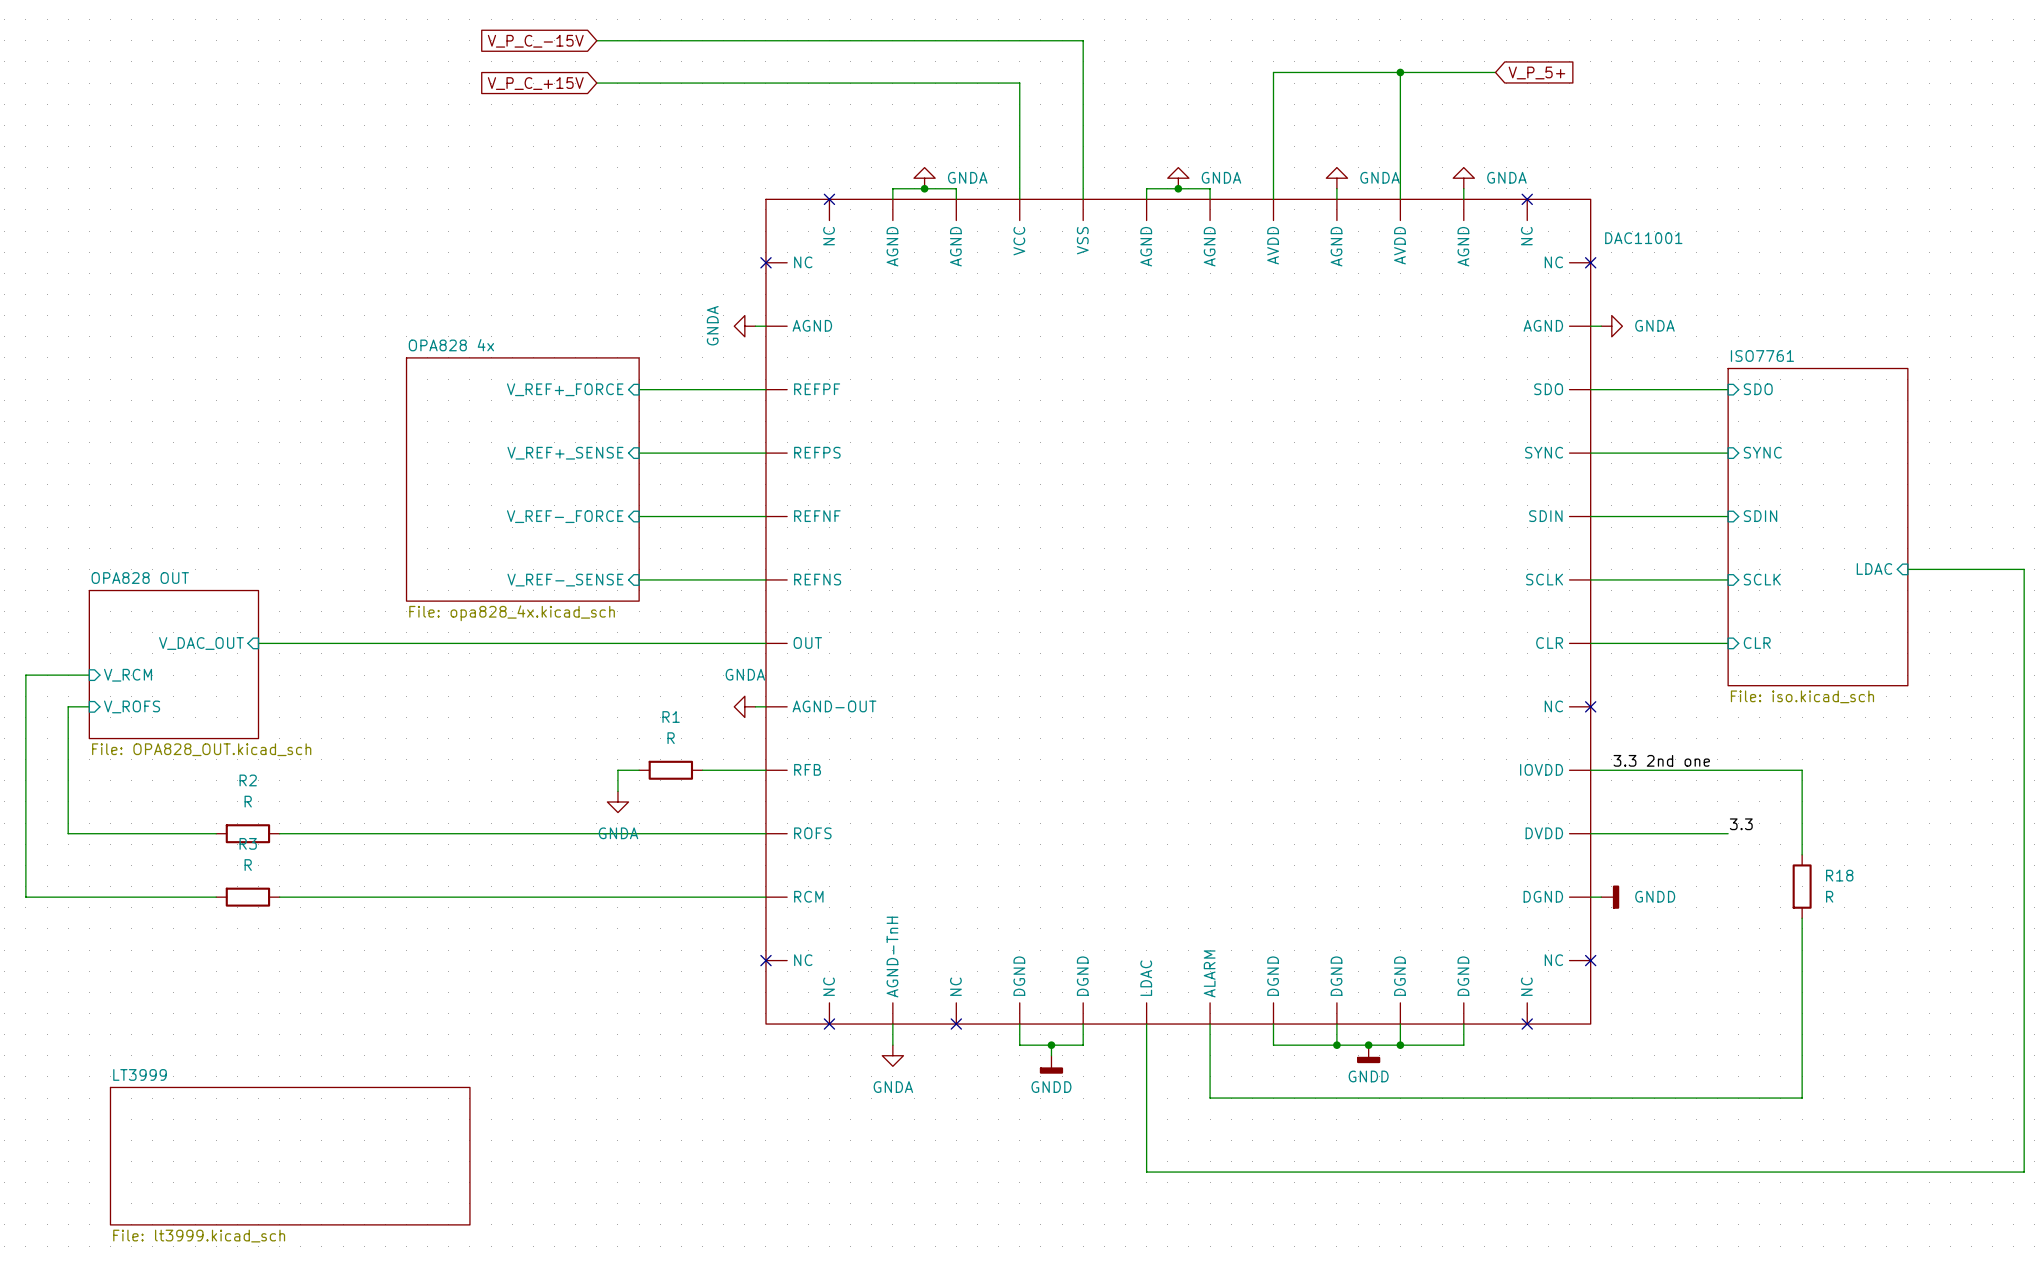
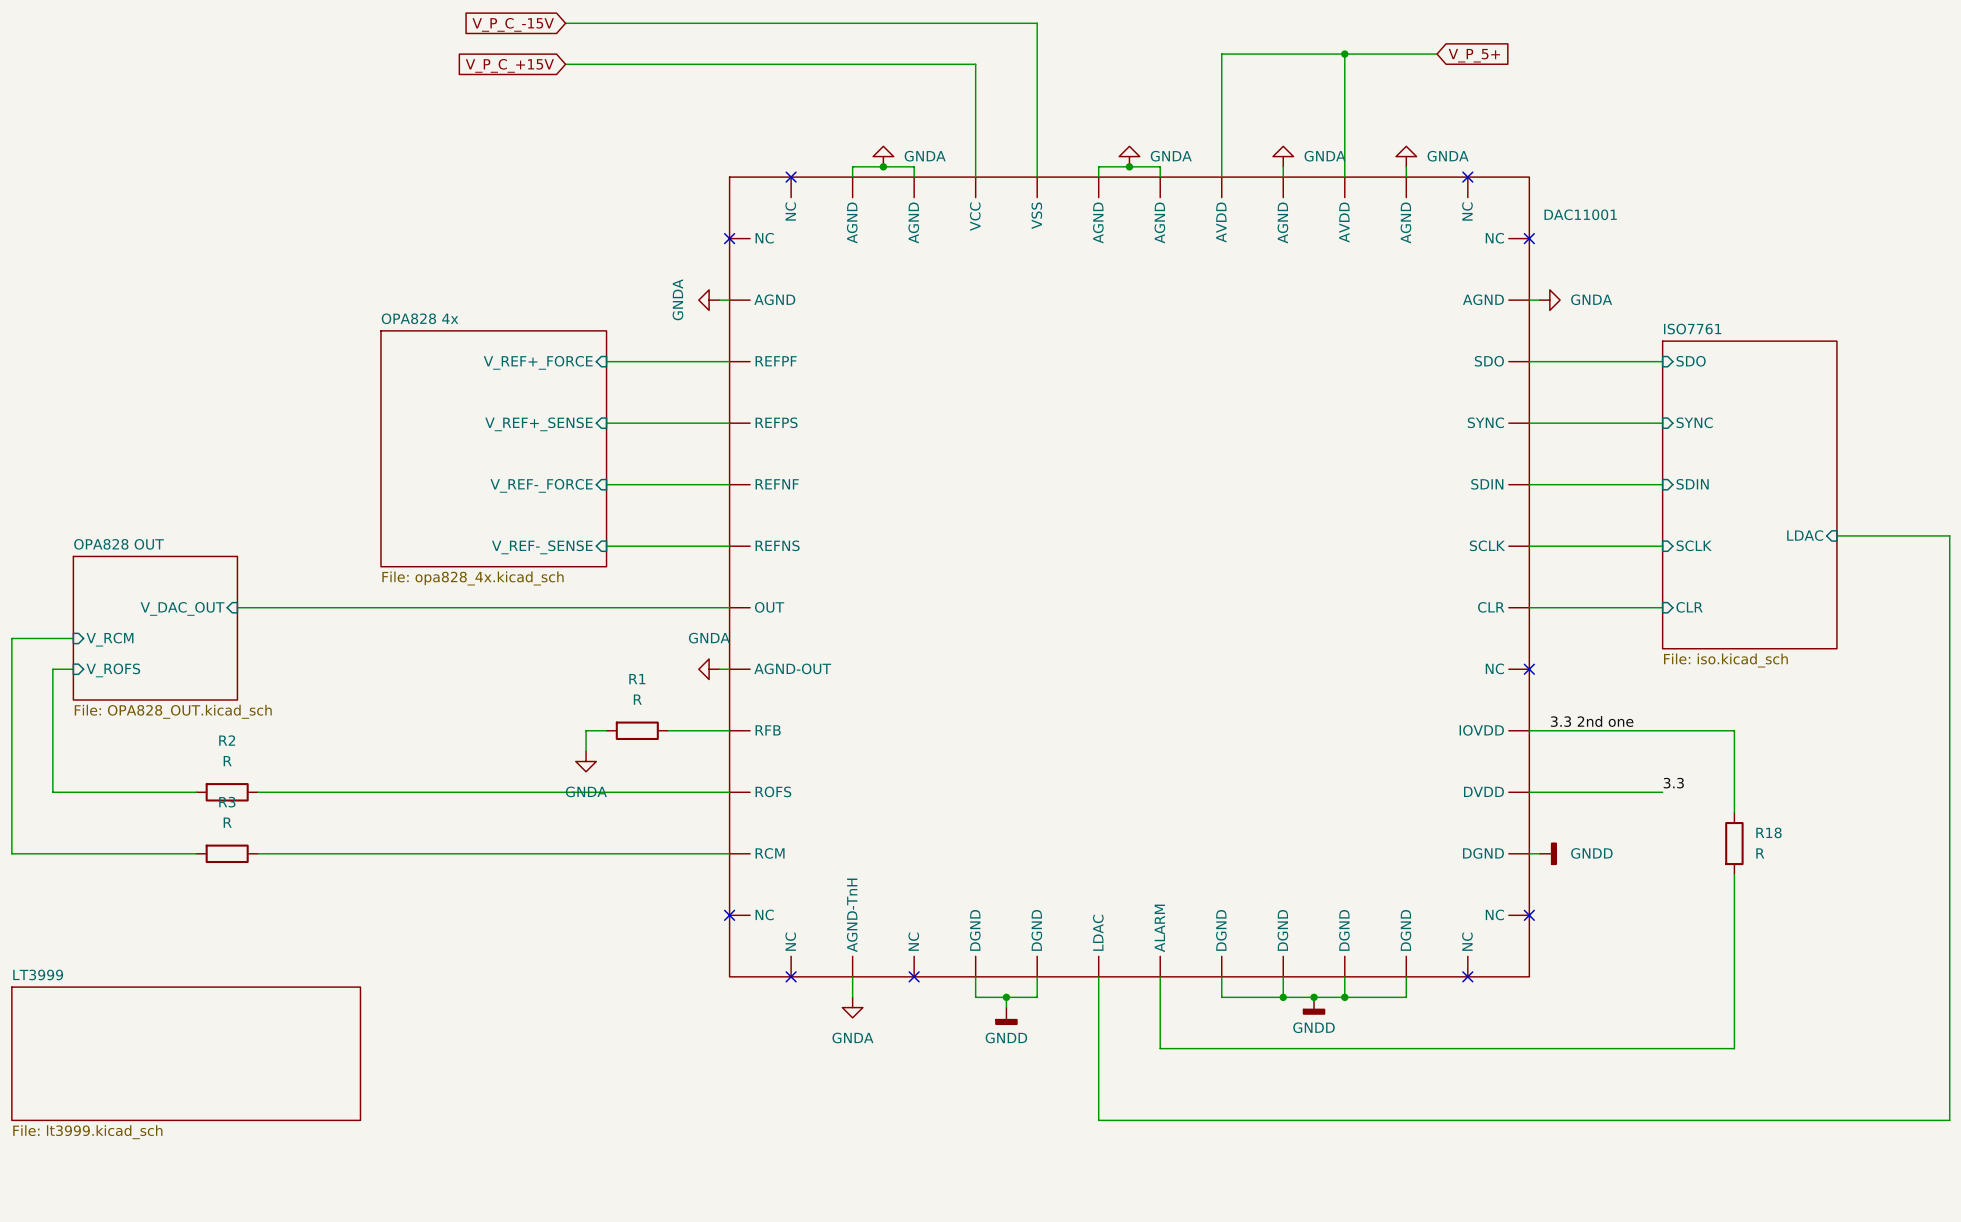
sheet LT3999 position: (290, 1156) -> (186, 1053)

